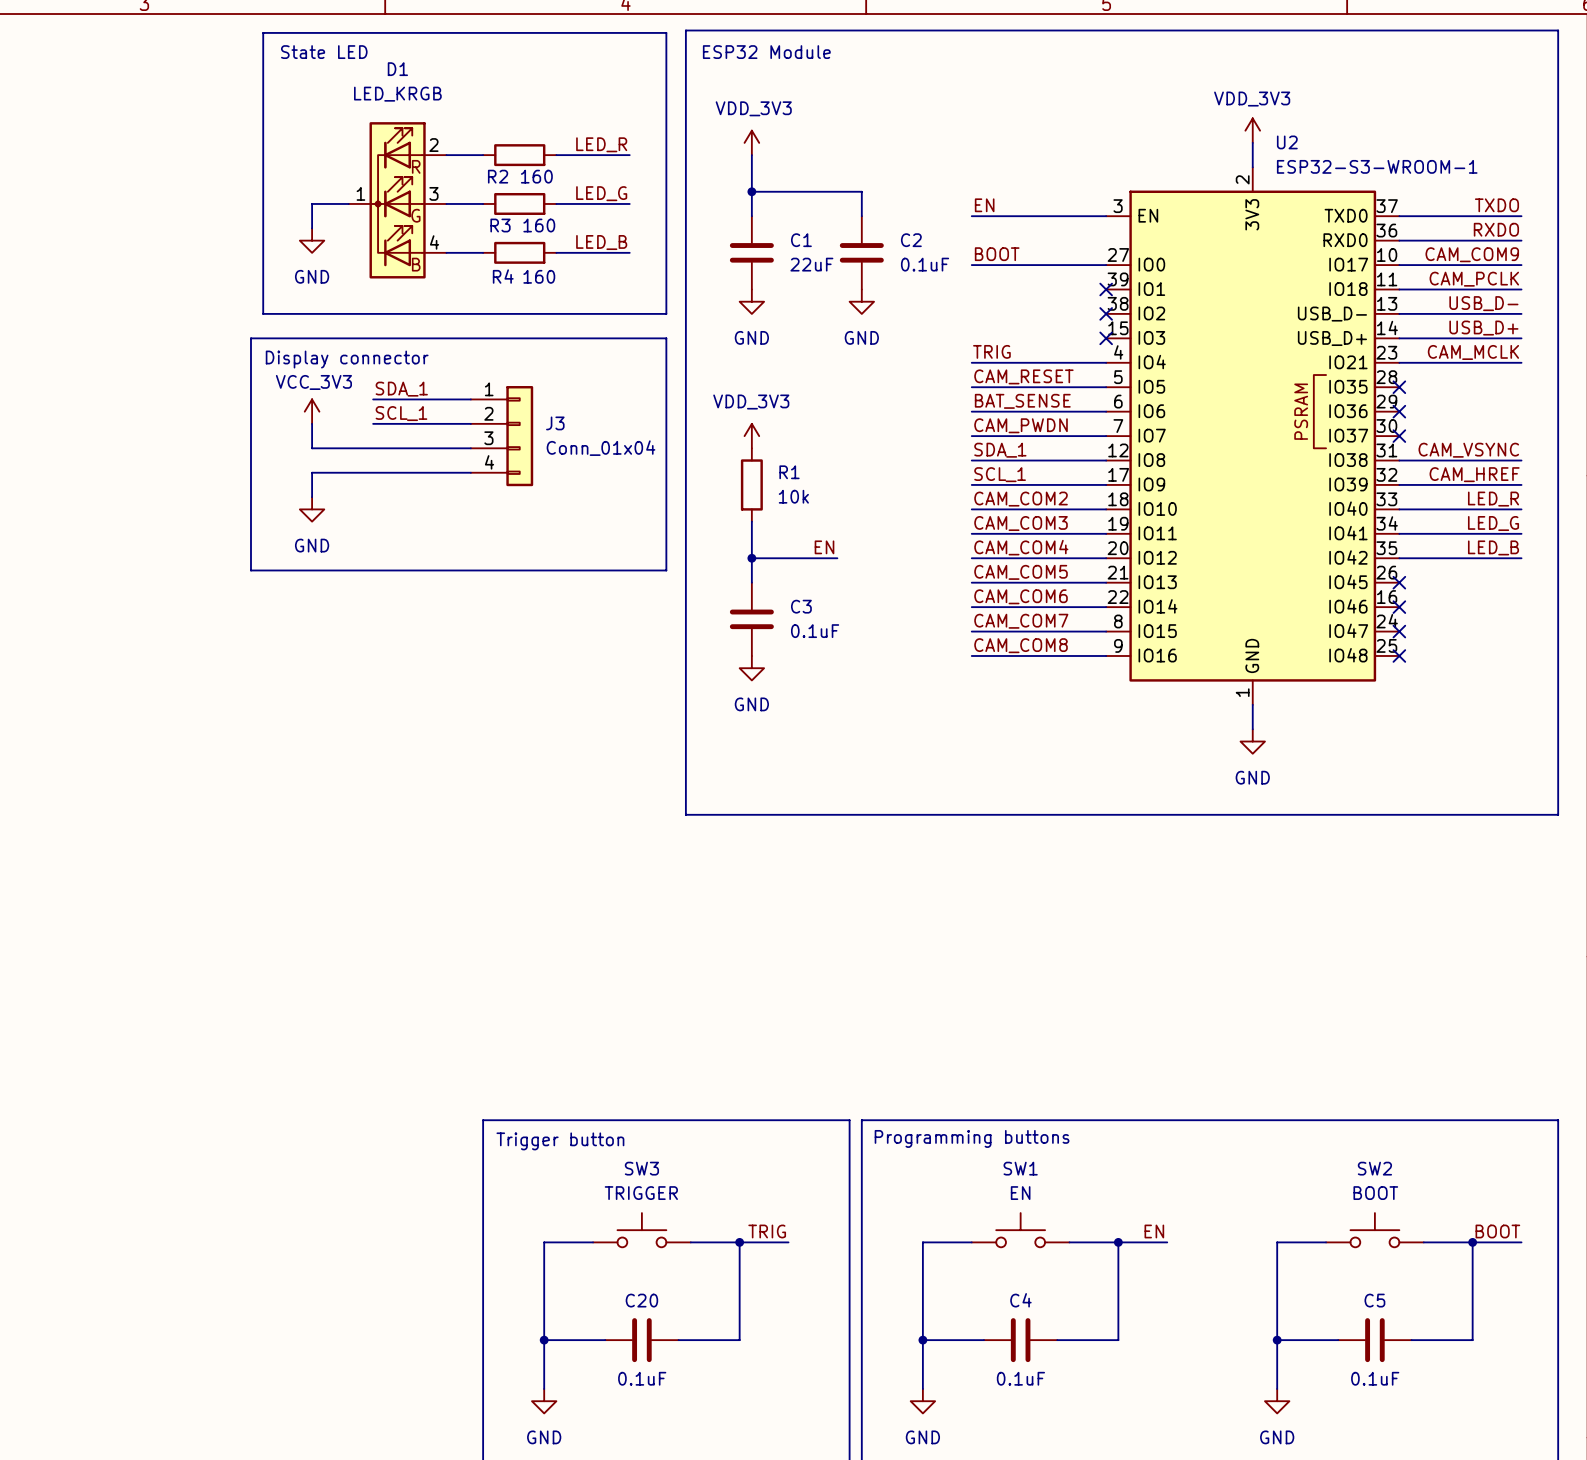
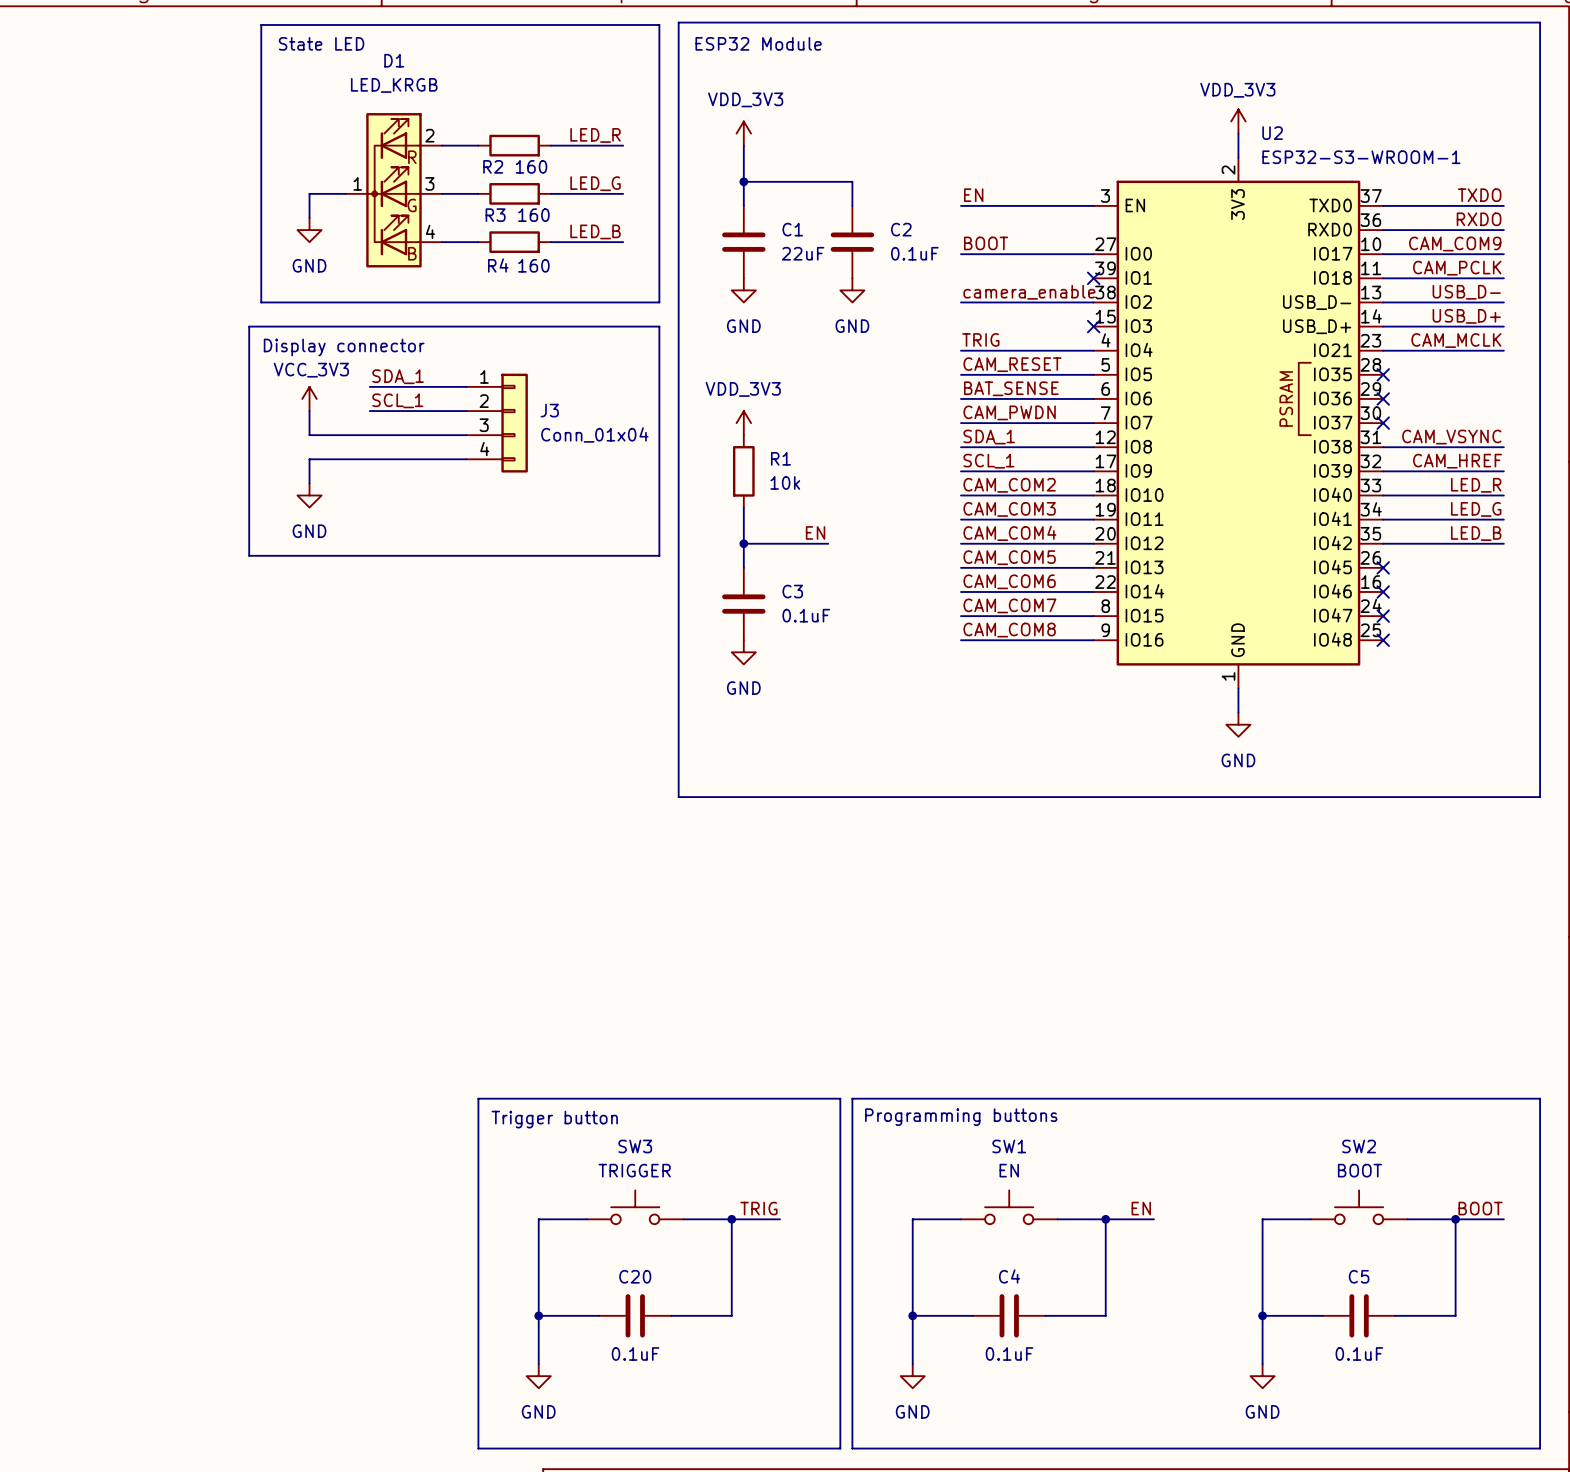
label: none -> camera_enable (1029, 292)
wire: none -> (960, 302) (1093, 302)
no-connect mark: (1106, 313) -> none

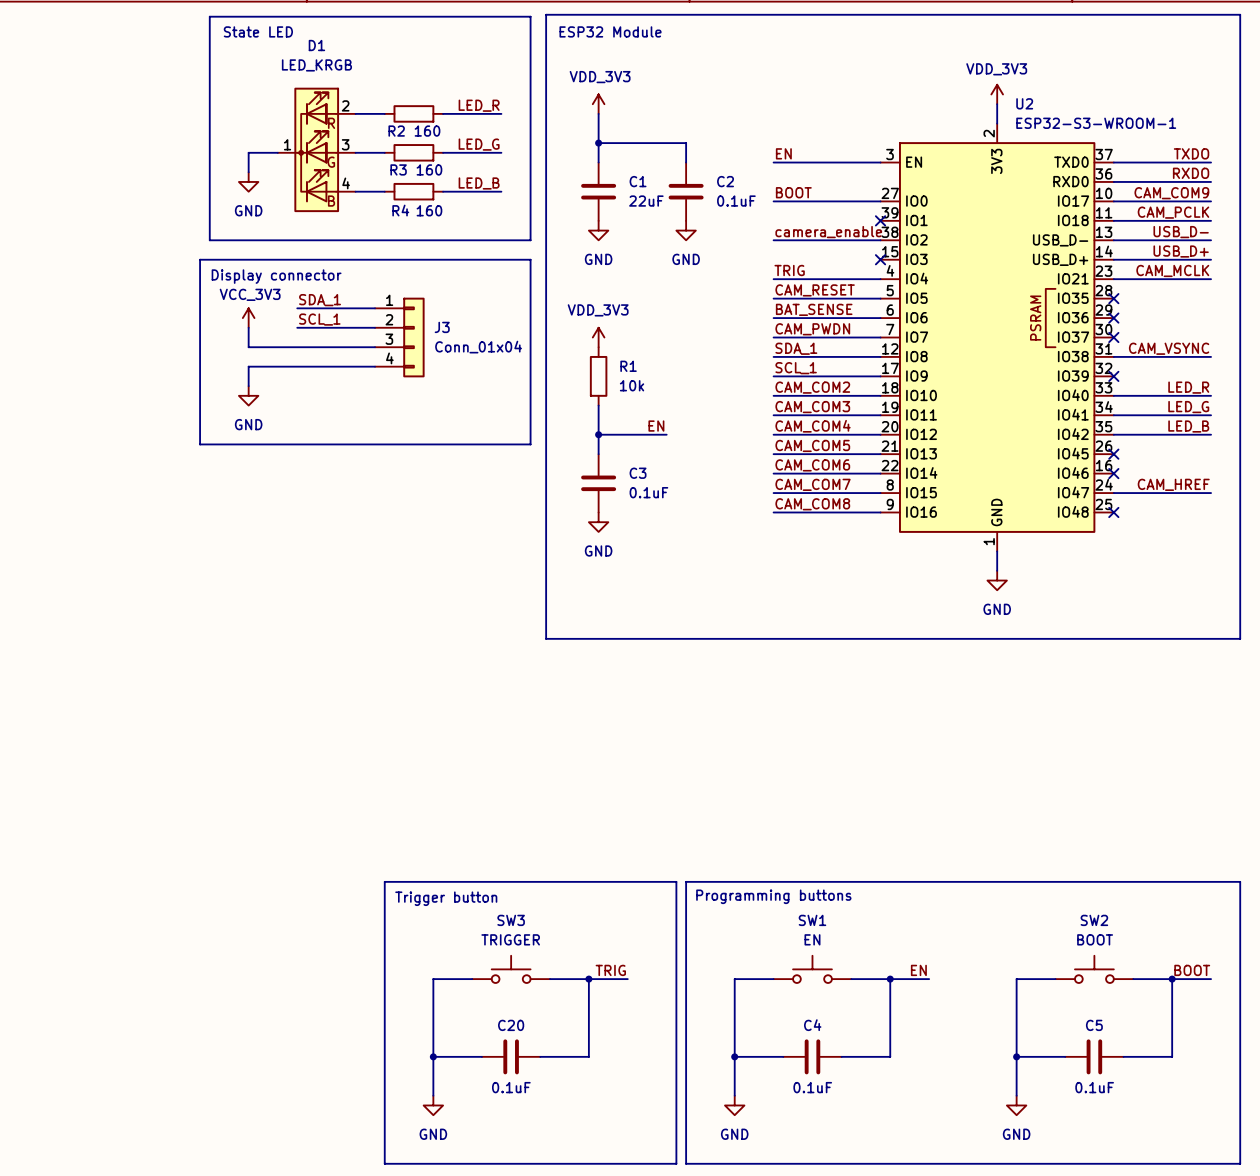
label position: CAM_HREF (1457, 461) -> CAM_HREF (1173, 484)
wire: (1383, 471) (1503, 471) -> (1113, 493) (1211, 493)
no-connect mark: none -> (1113, 376)
no-connect mark: (1383, 616) -> none

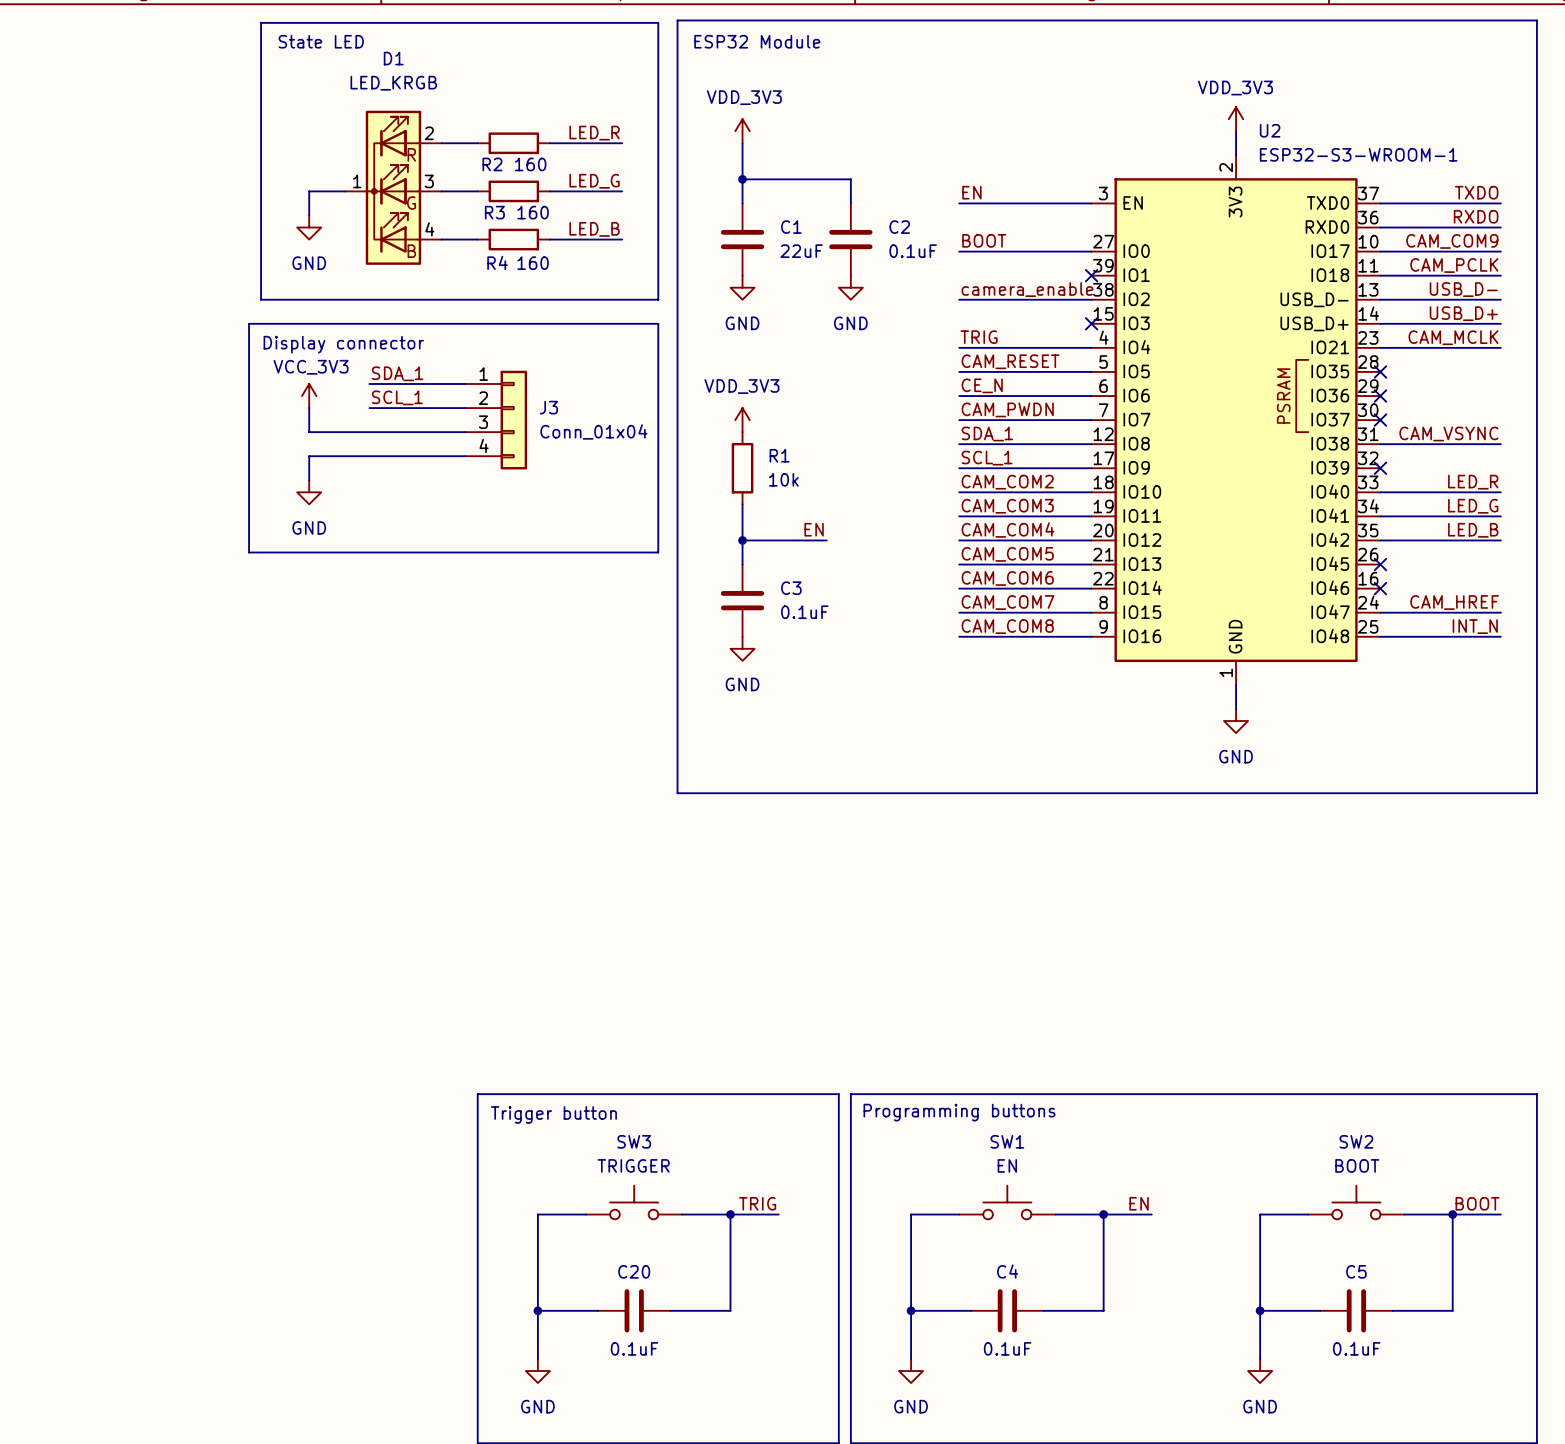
label: BAT_SENSE (814, 309) -> CE_N (982, 385)
label: none -> INT_N (1475, 626)
wire: none -> (1380, 636) (1500, 636)
no-connect mark: (1113, 512) -> none

